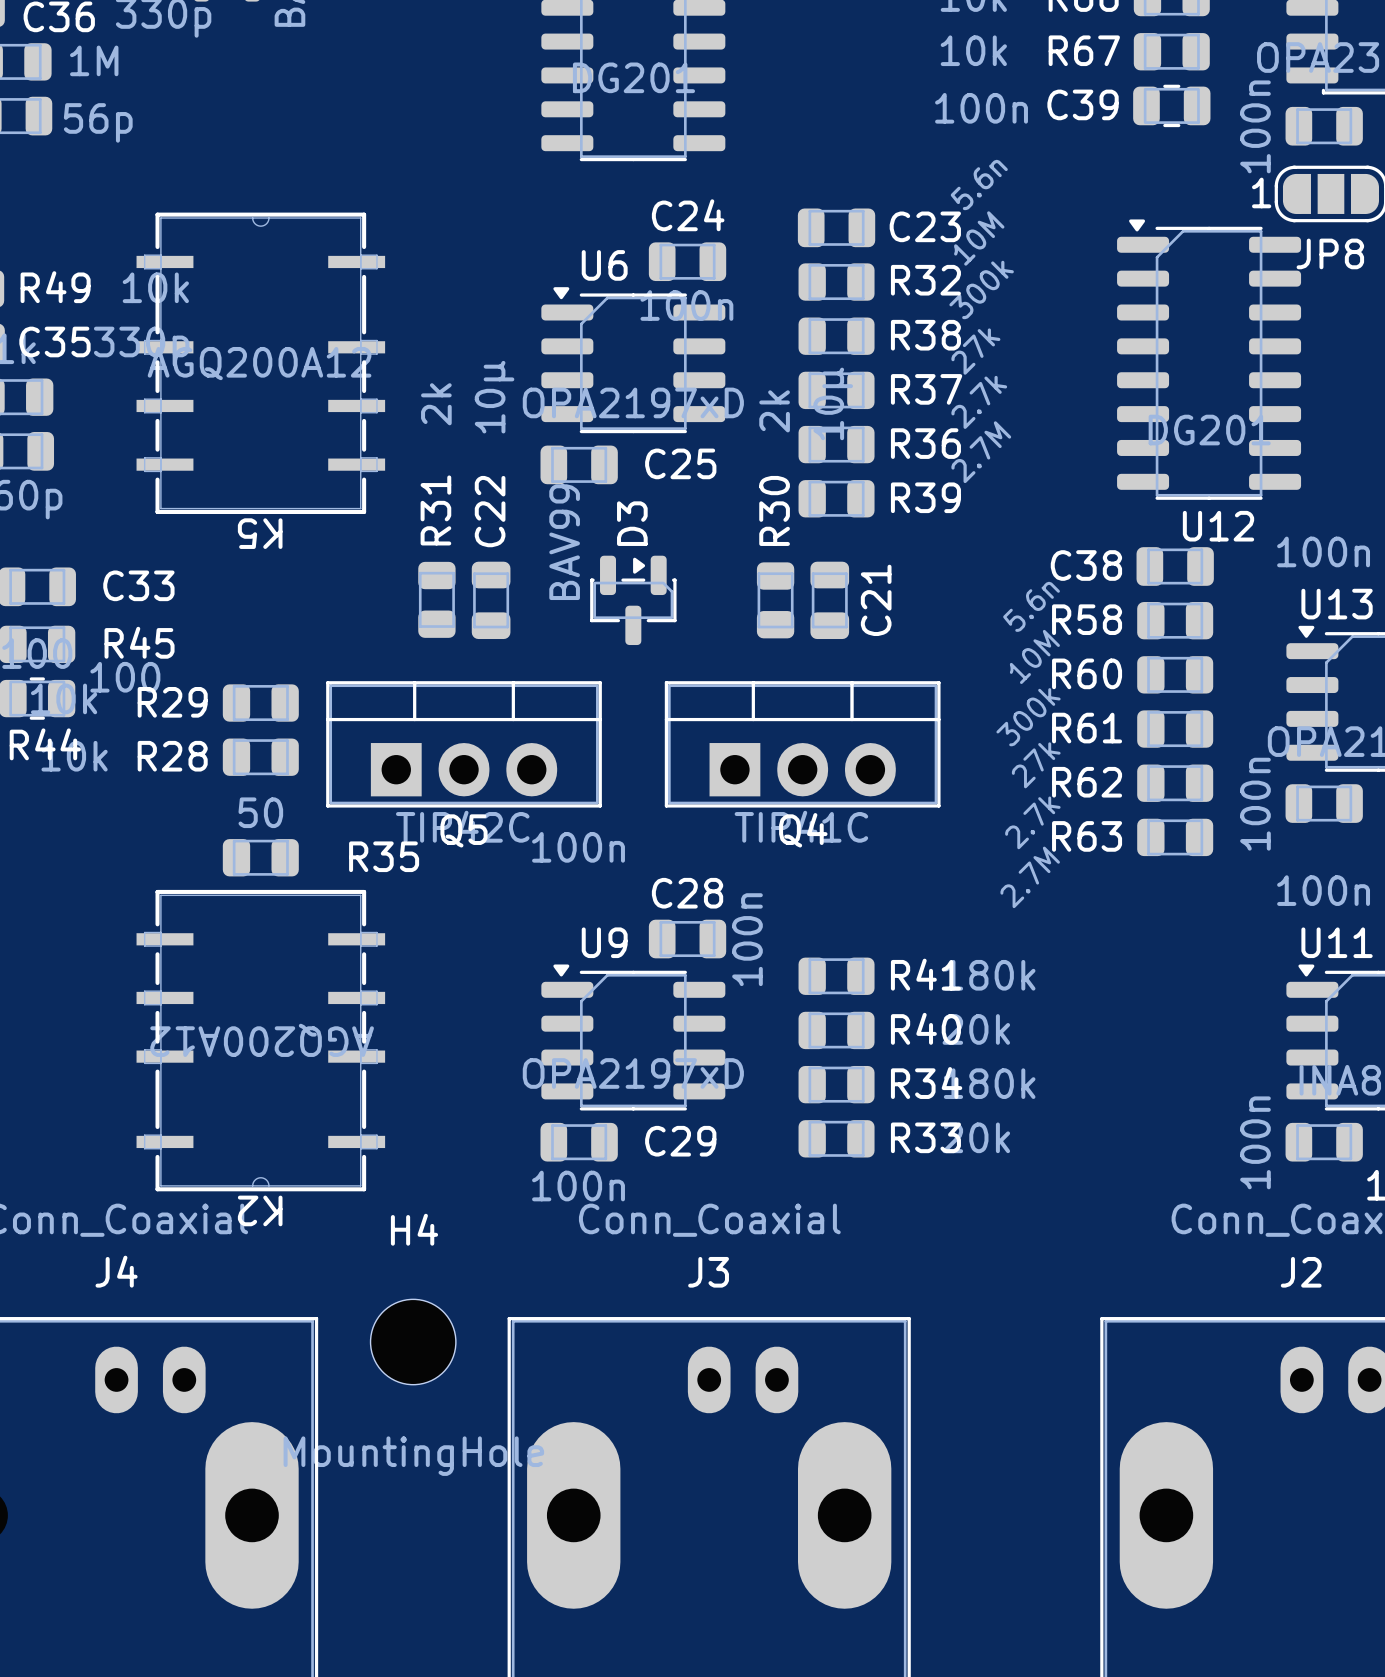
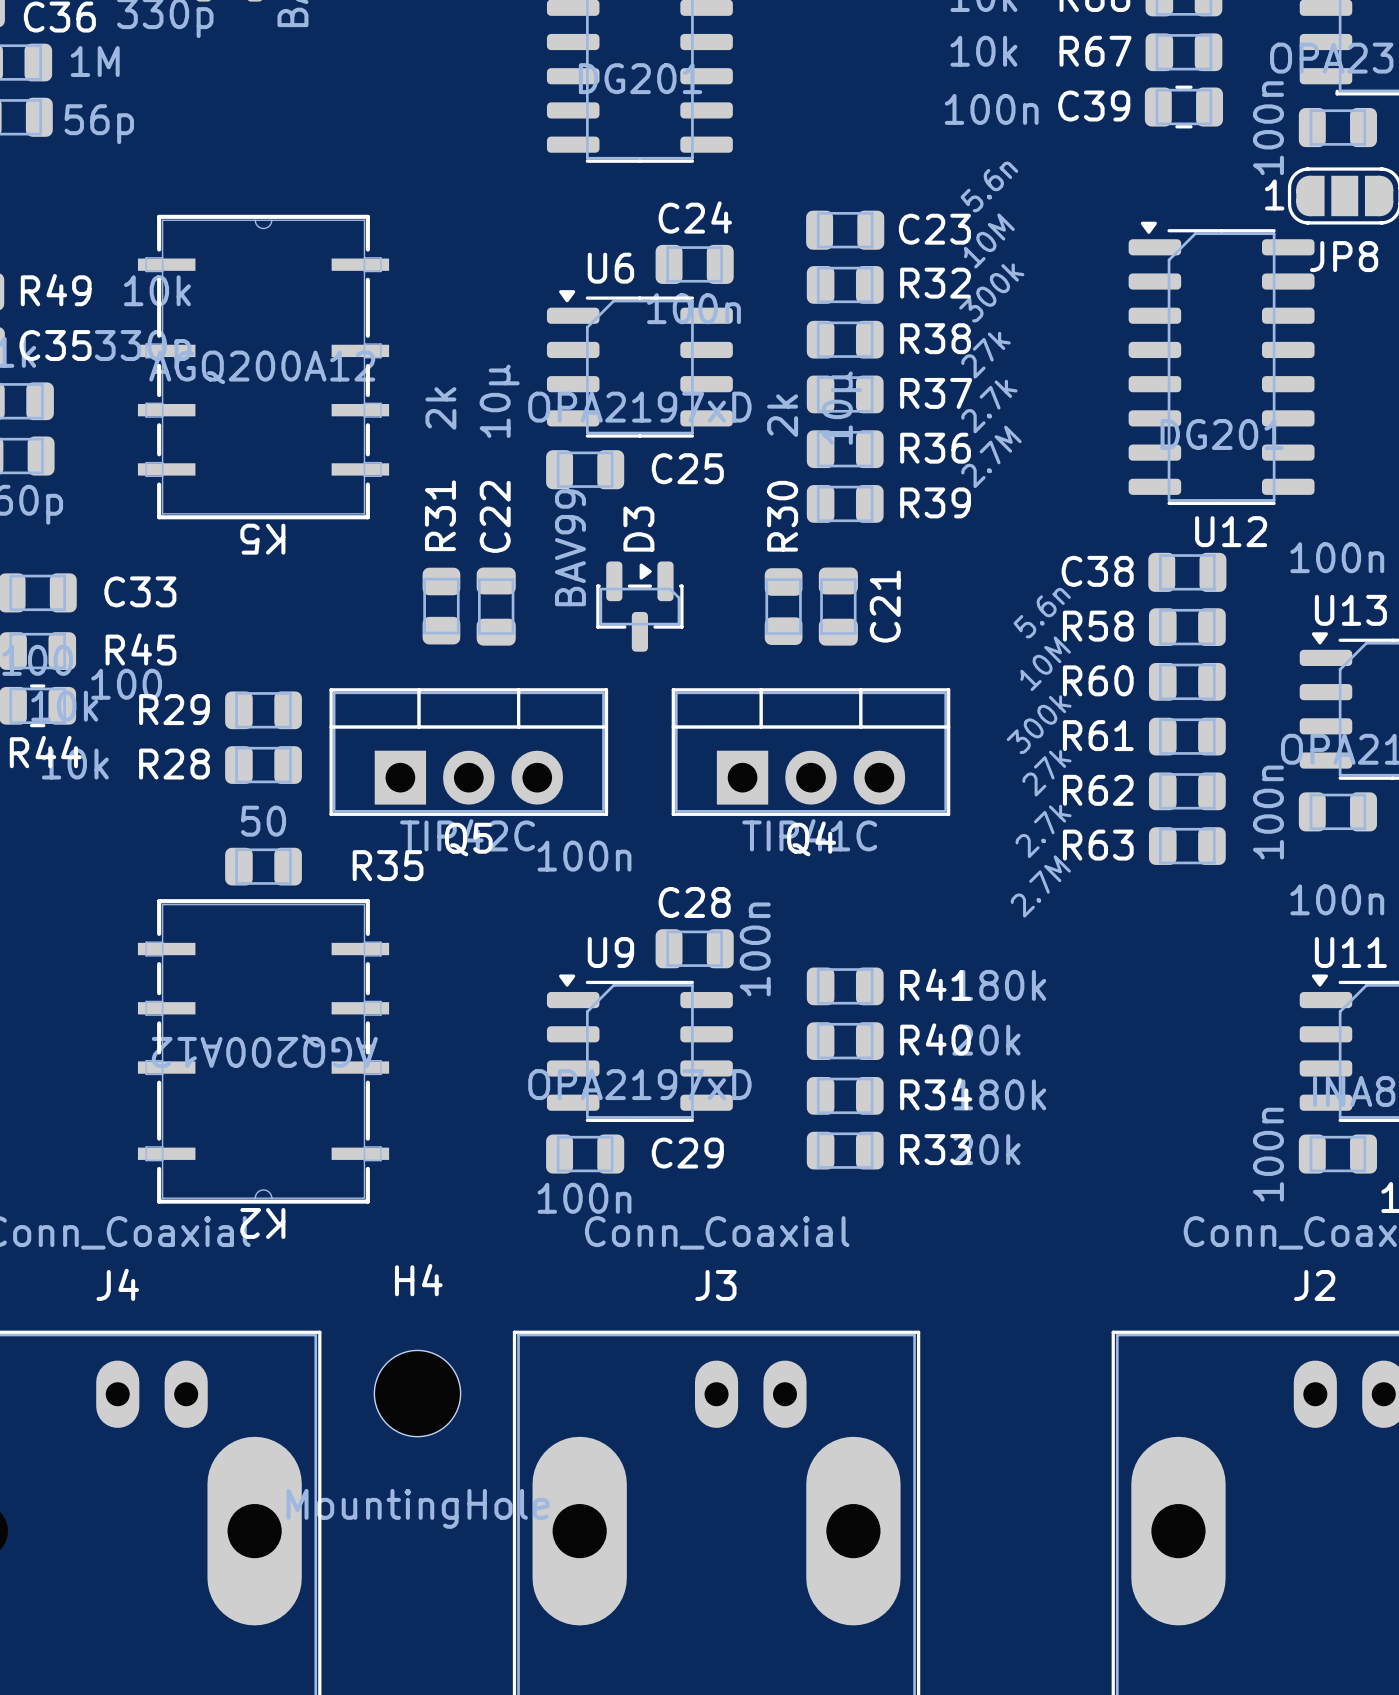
H4 position: (413, 1342) -> (417, 1393)

